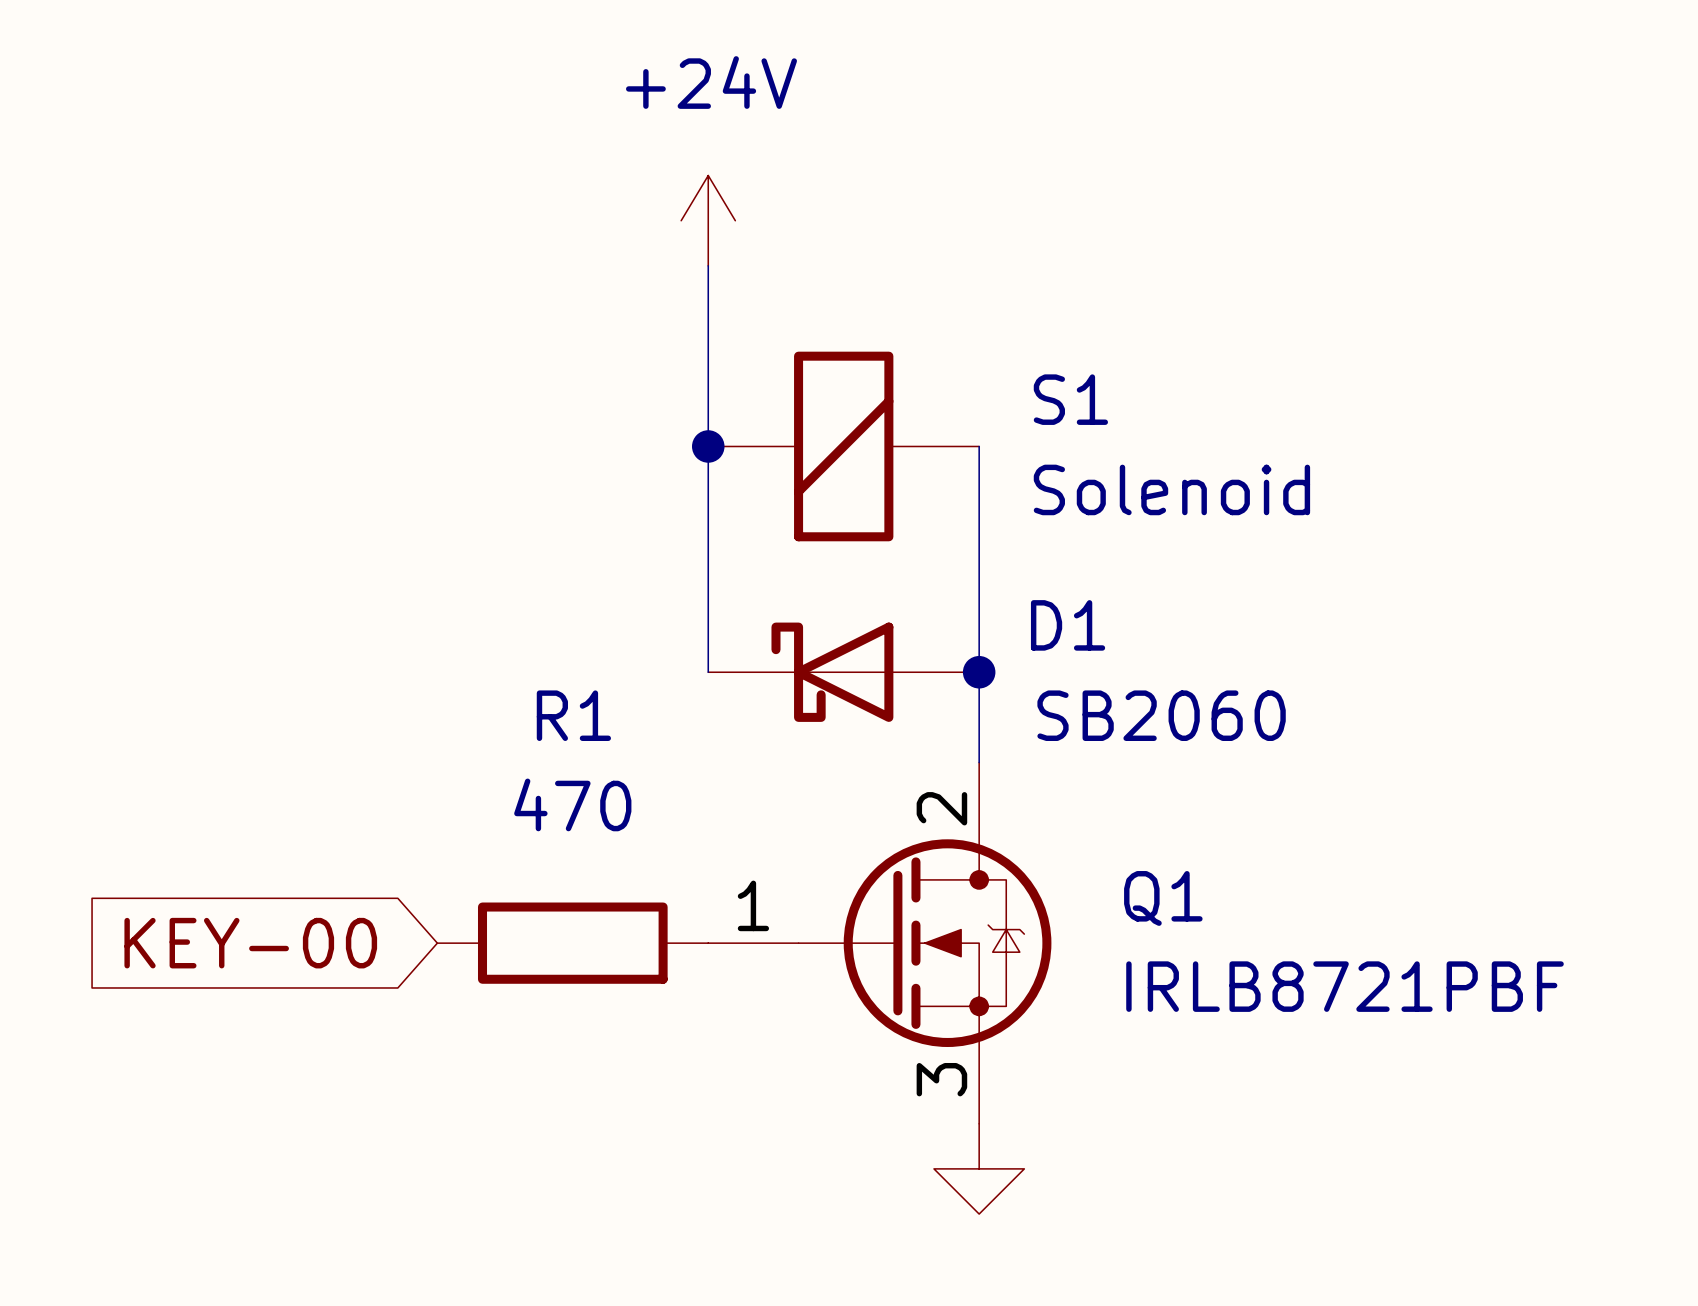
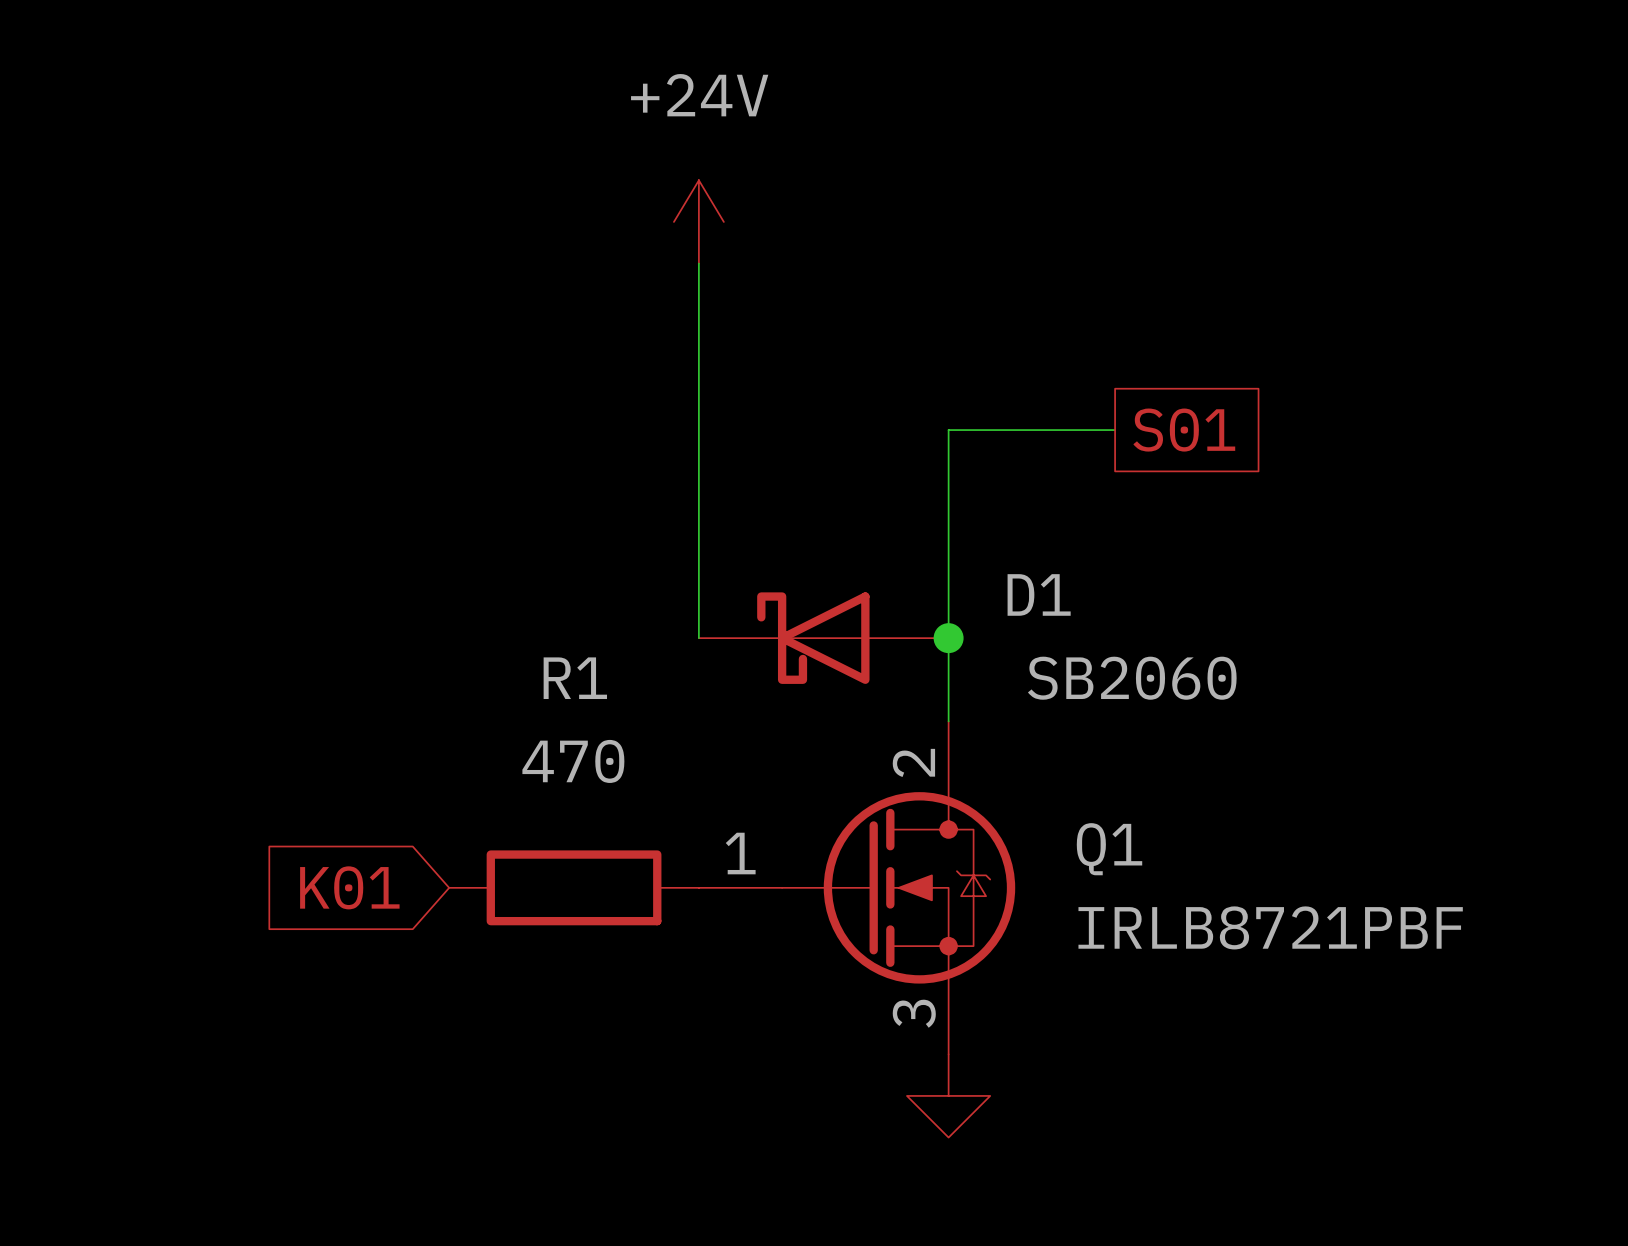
junction: (708, 446) -> none
S1: Solenoid (843, 446) -> none
wire: none -> (948, 430) (1115, 430)
global label: none -> S01 (1184, 430)
global label: KEY-00 (250, 943) -> K01 (349, 887)

